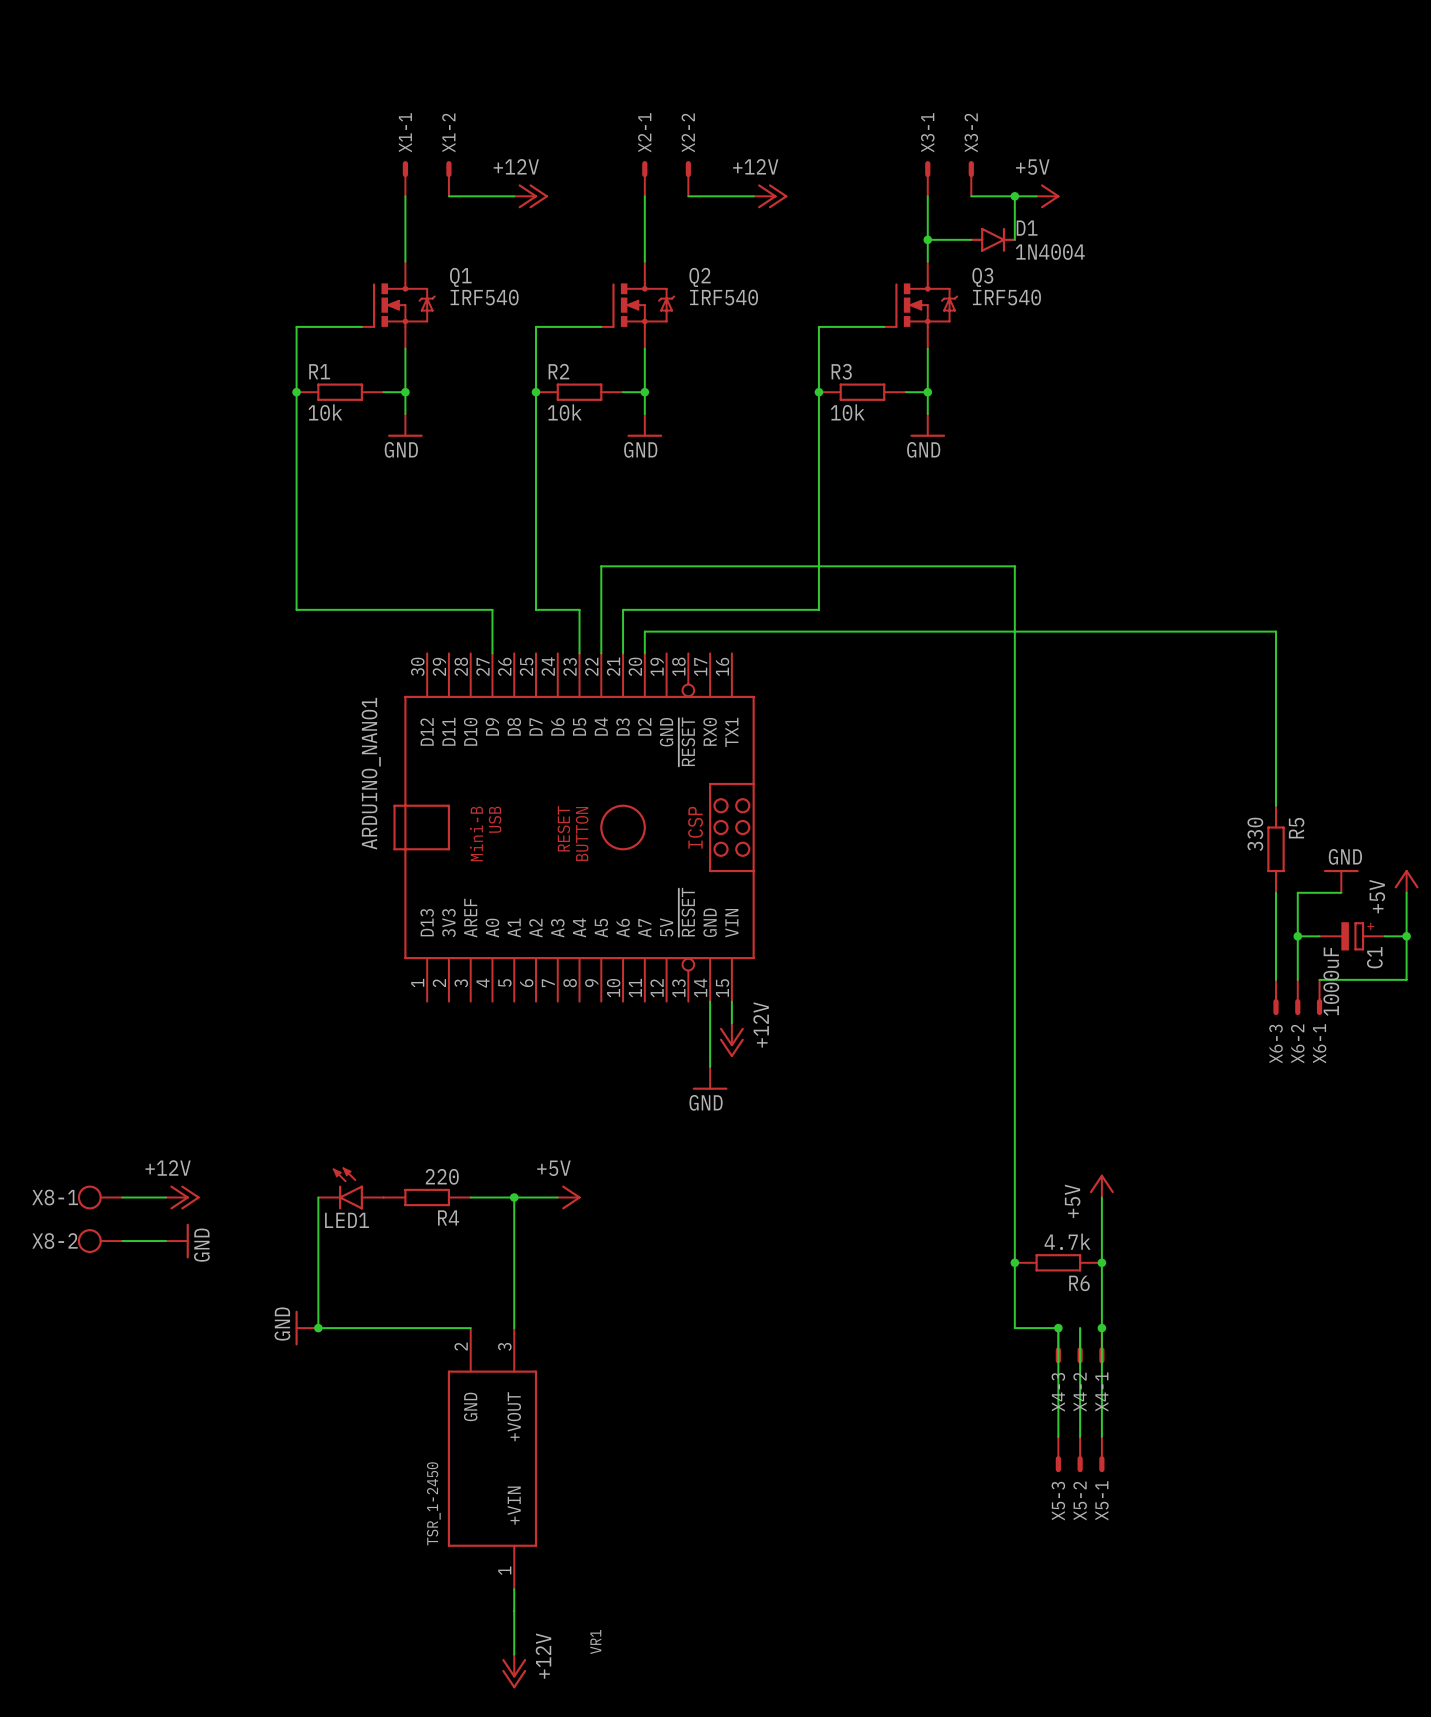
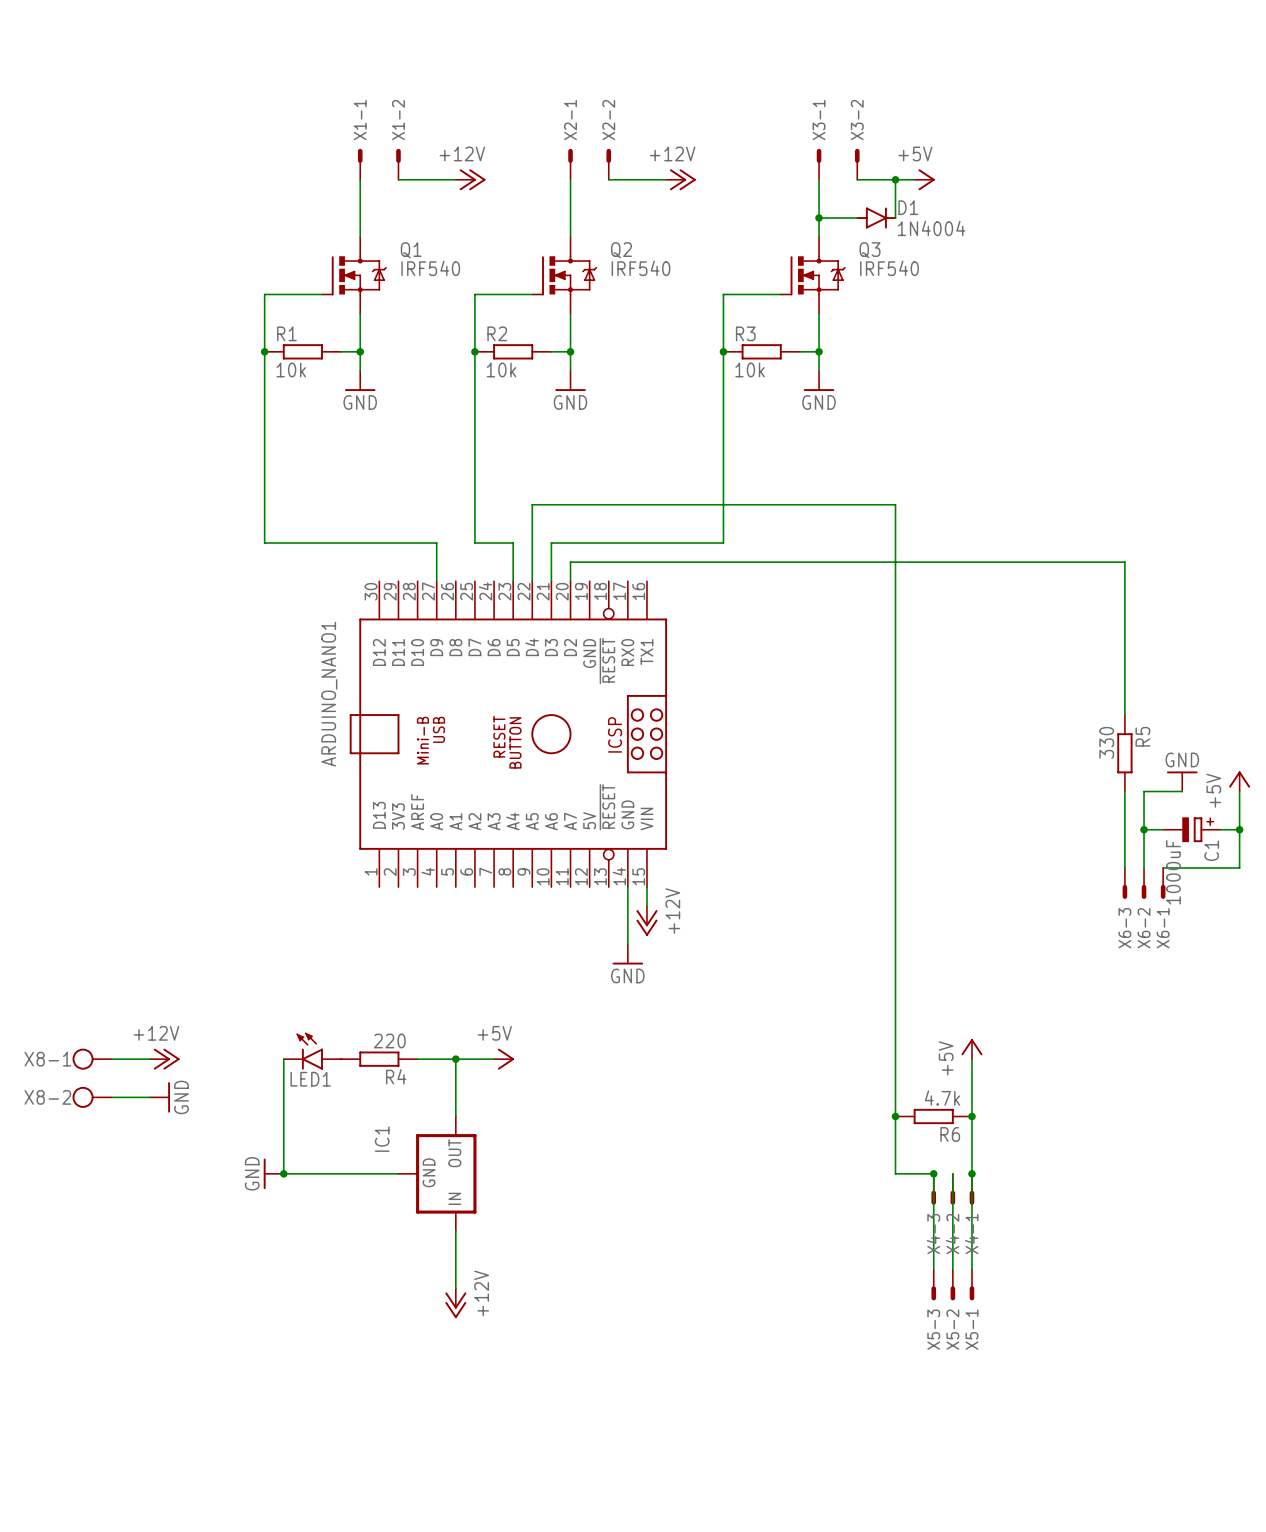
wire: (514, 1262) (514, 1328) -> (455, 1231) (455, 1288)
IC1: none -> (437, 1173)
VR1: TSR_1-2450 (492, 1458) -> none
wire: (514, 1589) (514, 1654) -> none
power symbol position: +12V (514, 1671) -> +12V (455, 1303)

